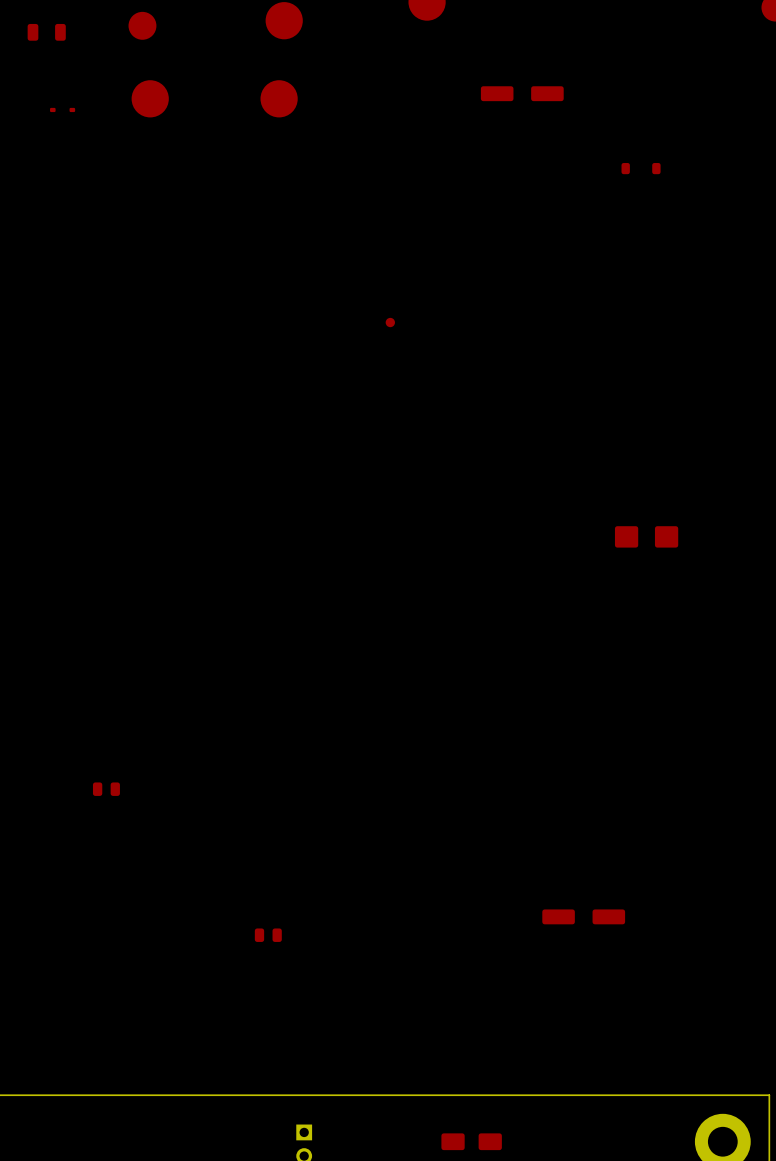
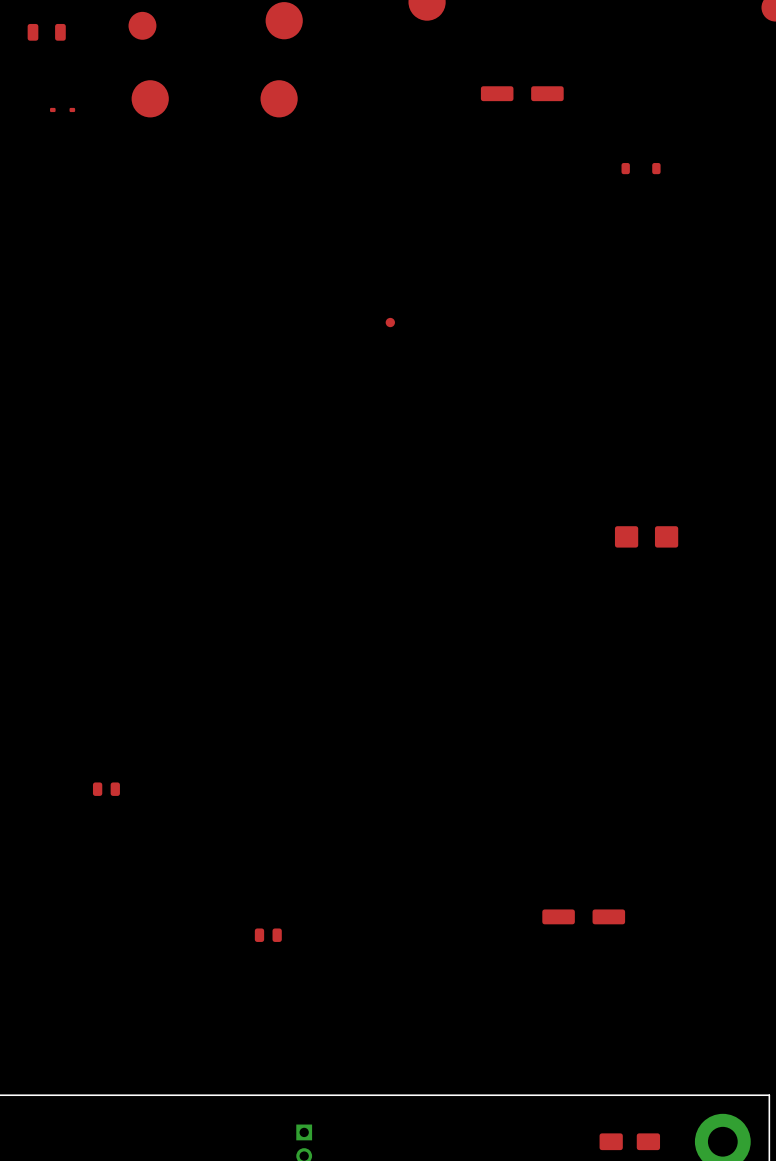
part position: (471, 1141) -> (629, 1141)

